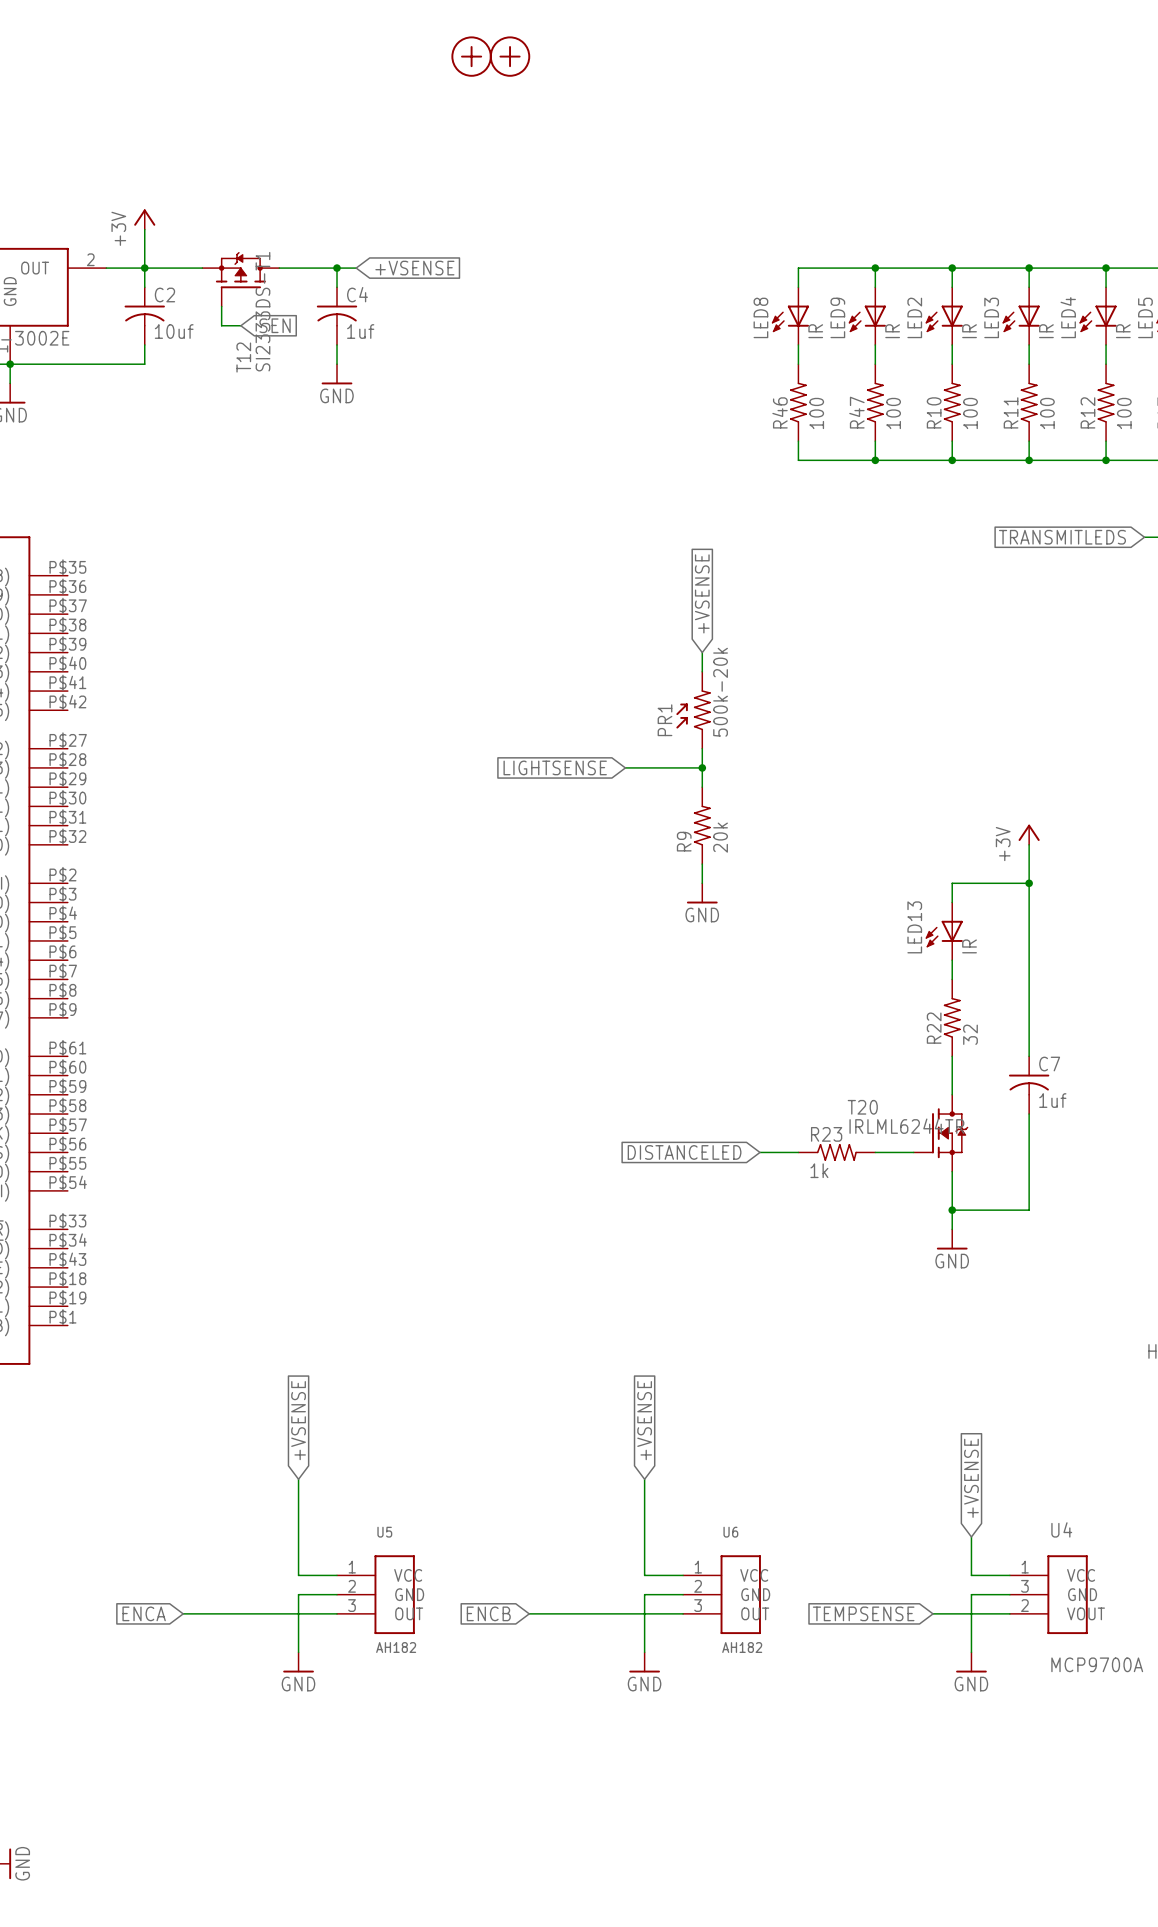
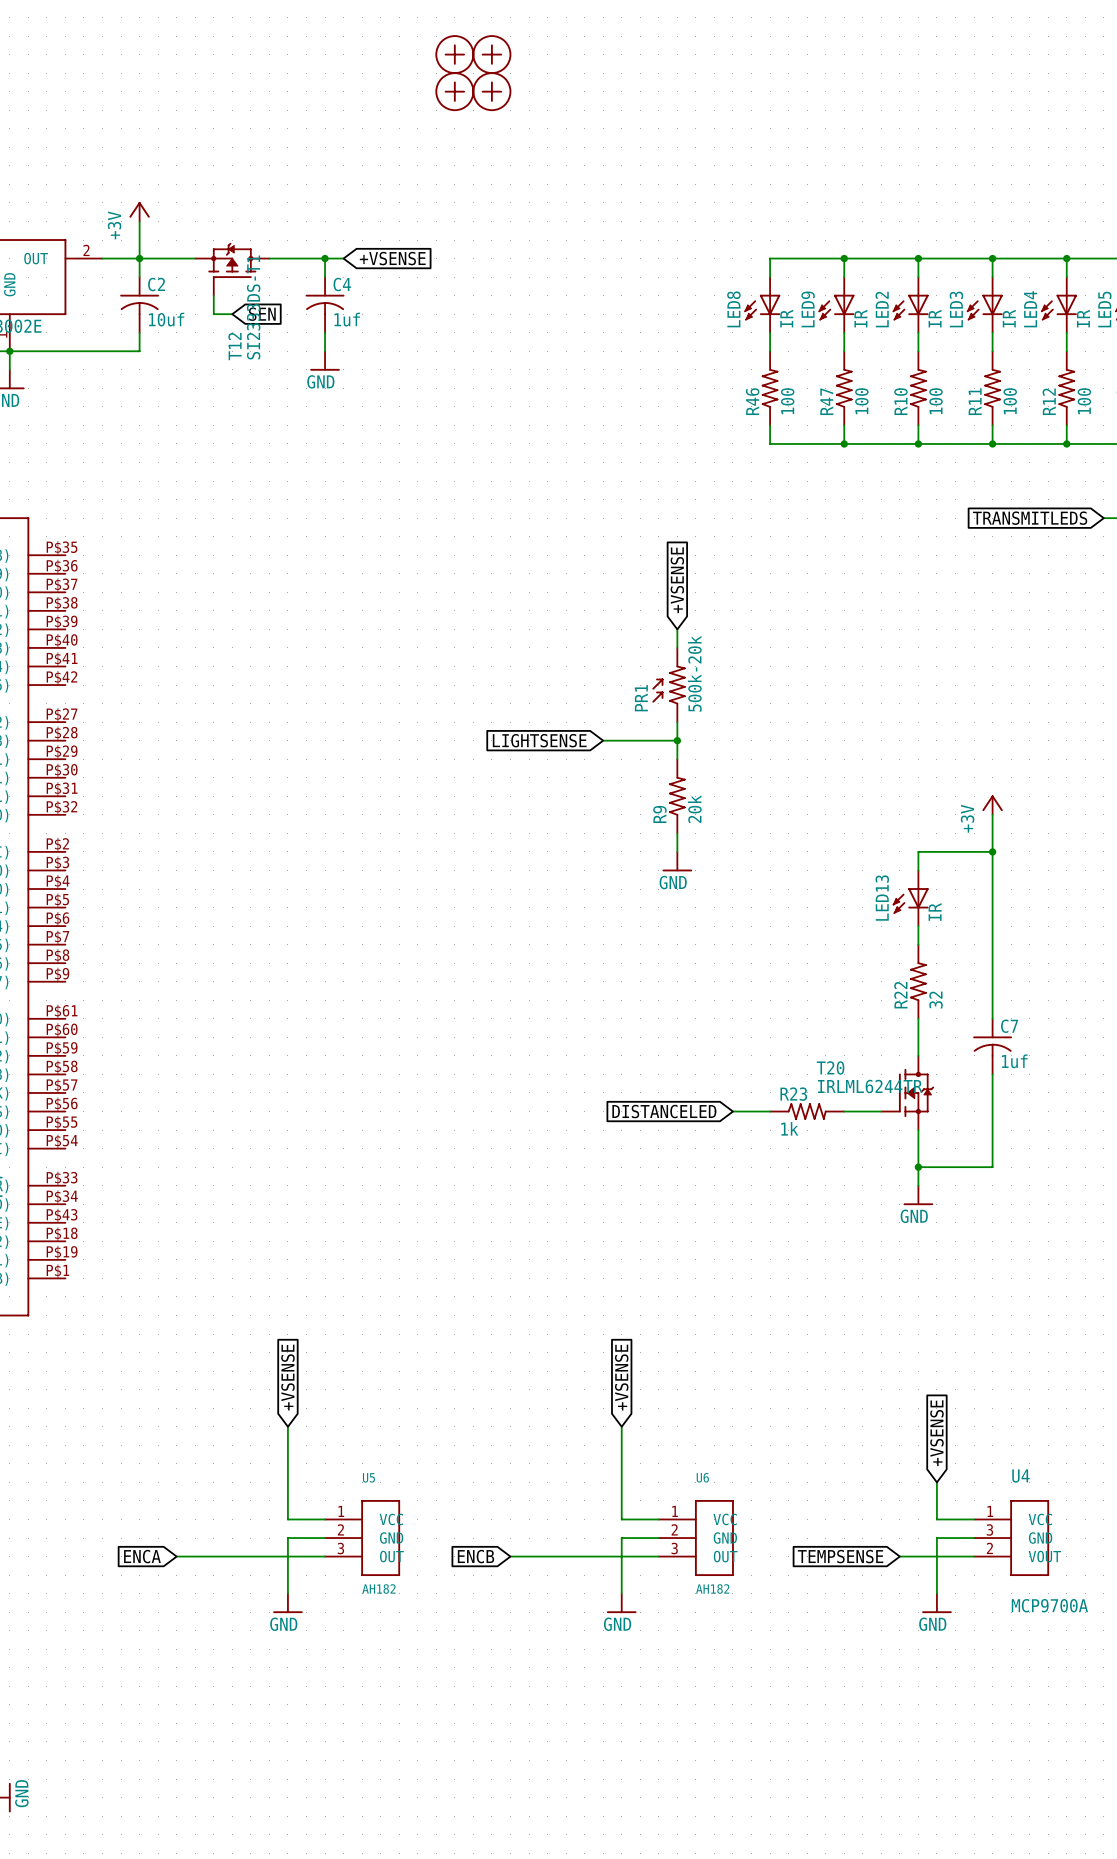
part: none -> (454, 91)
part: none -> (491, 91)

